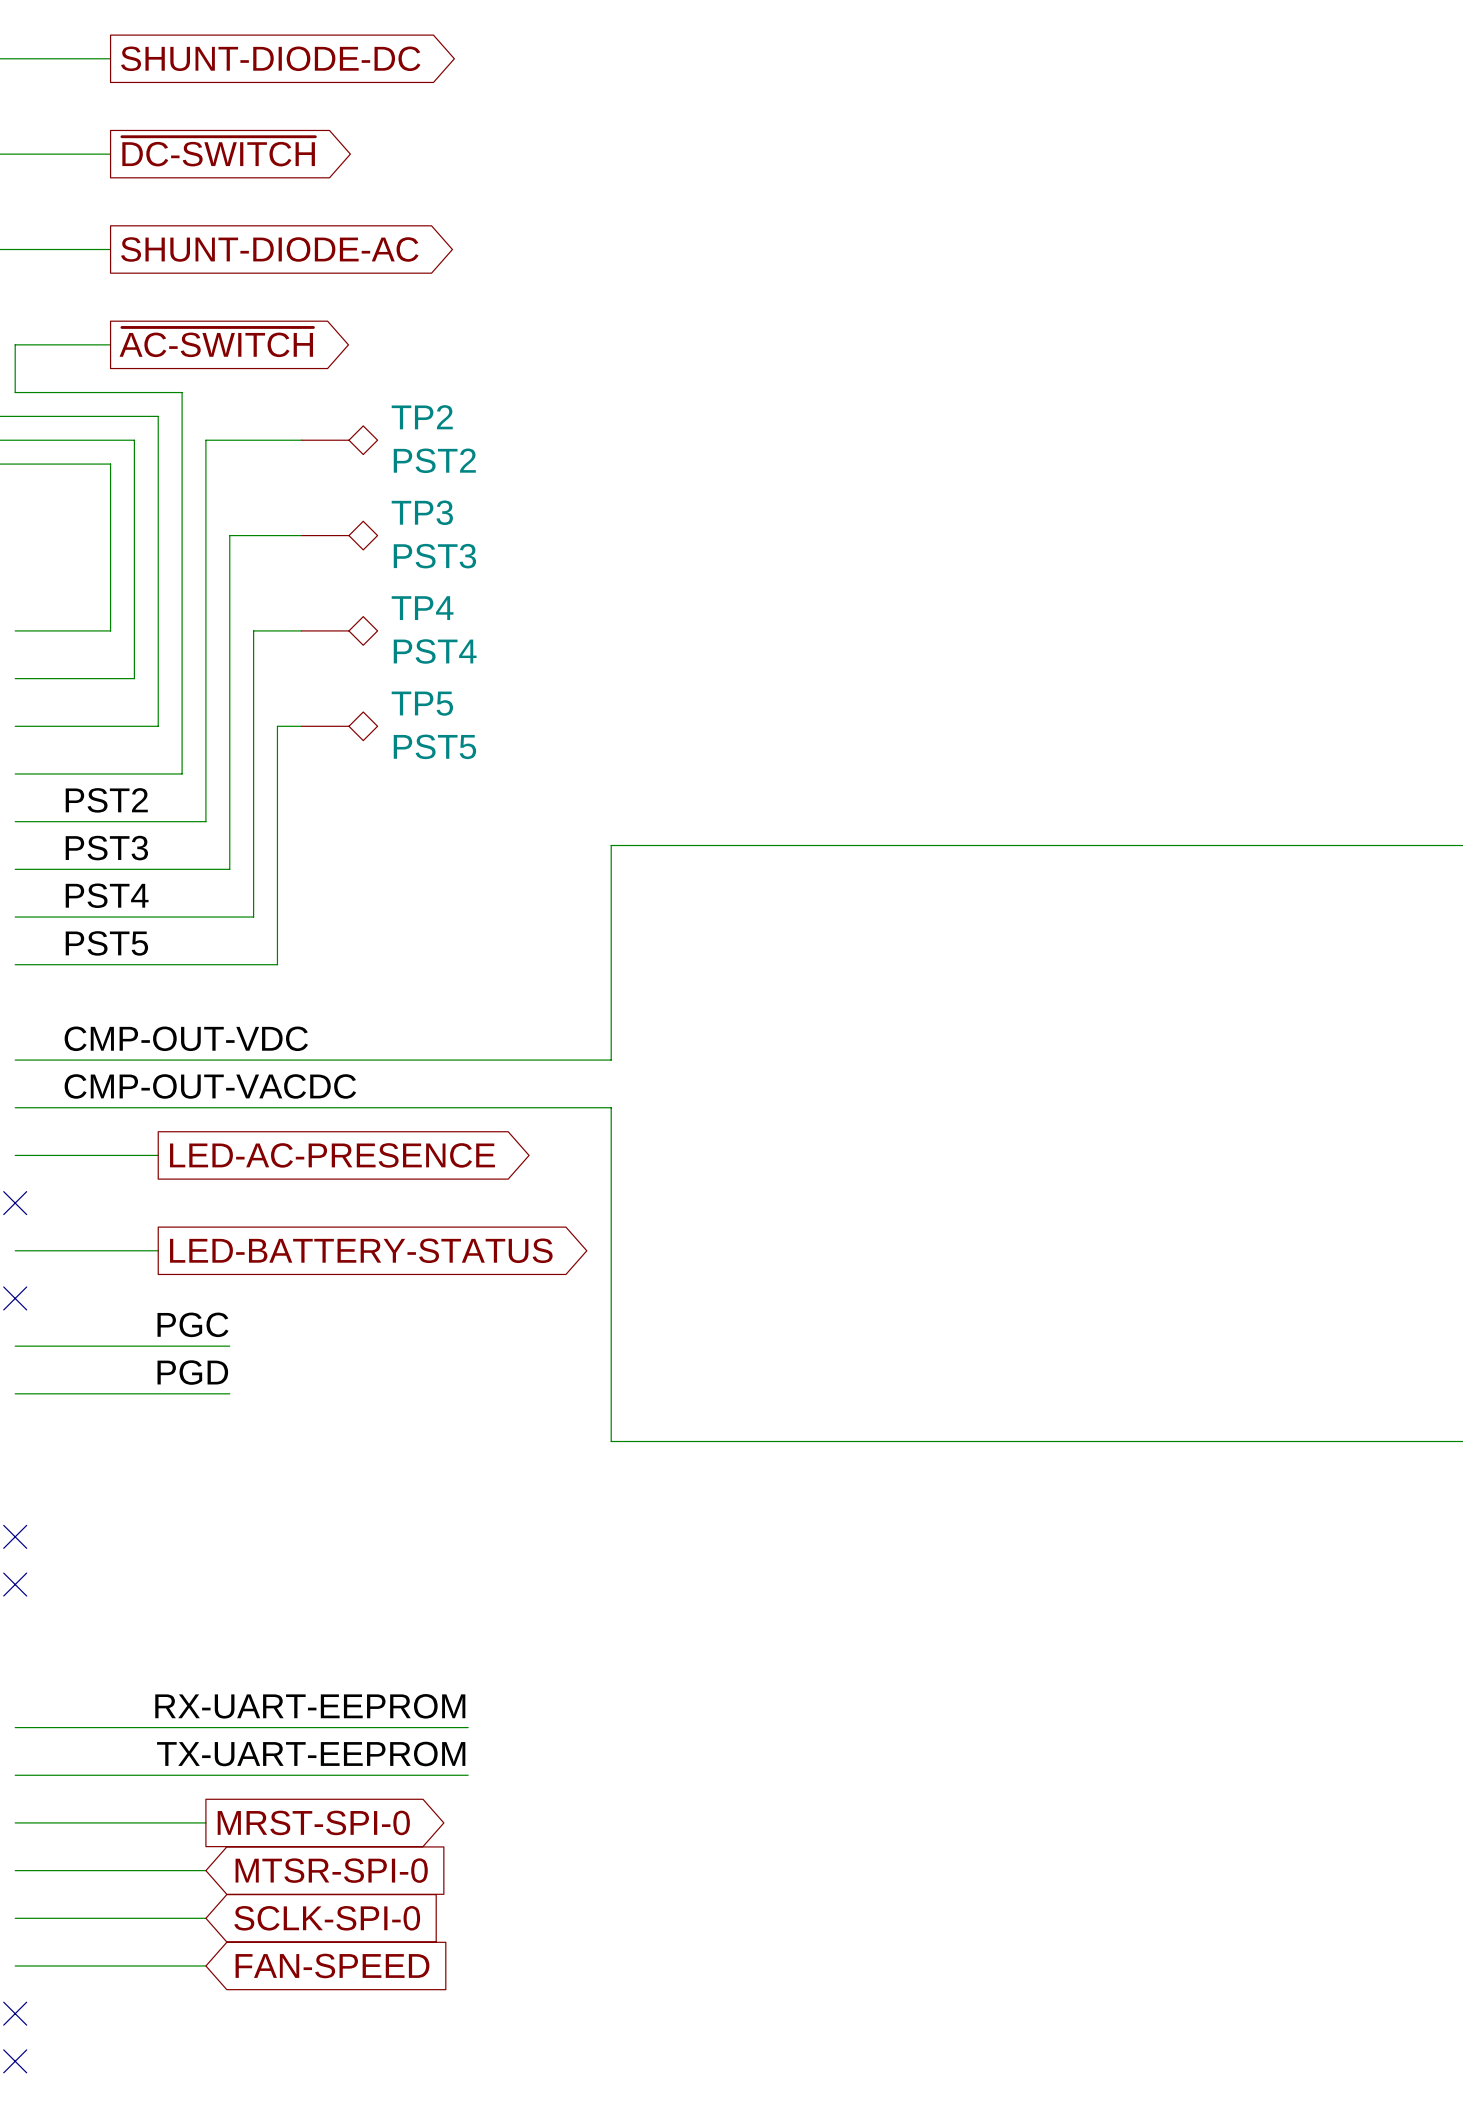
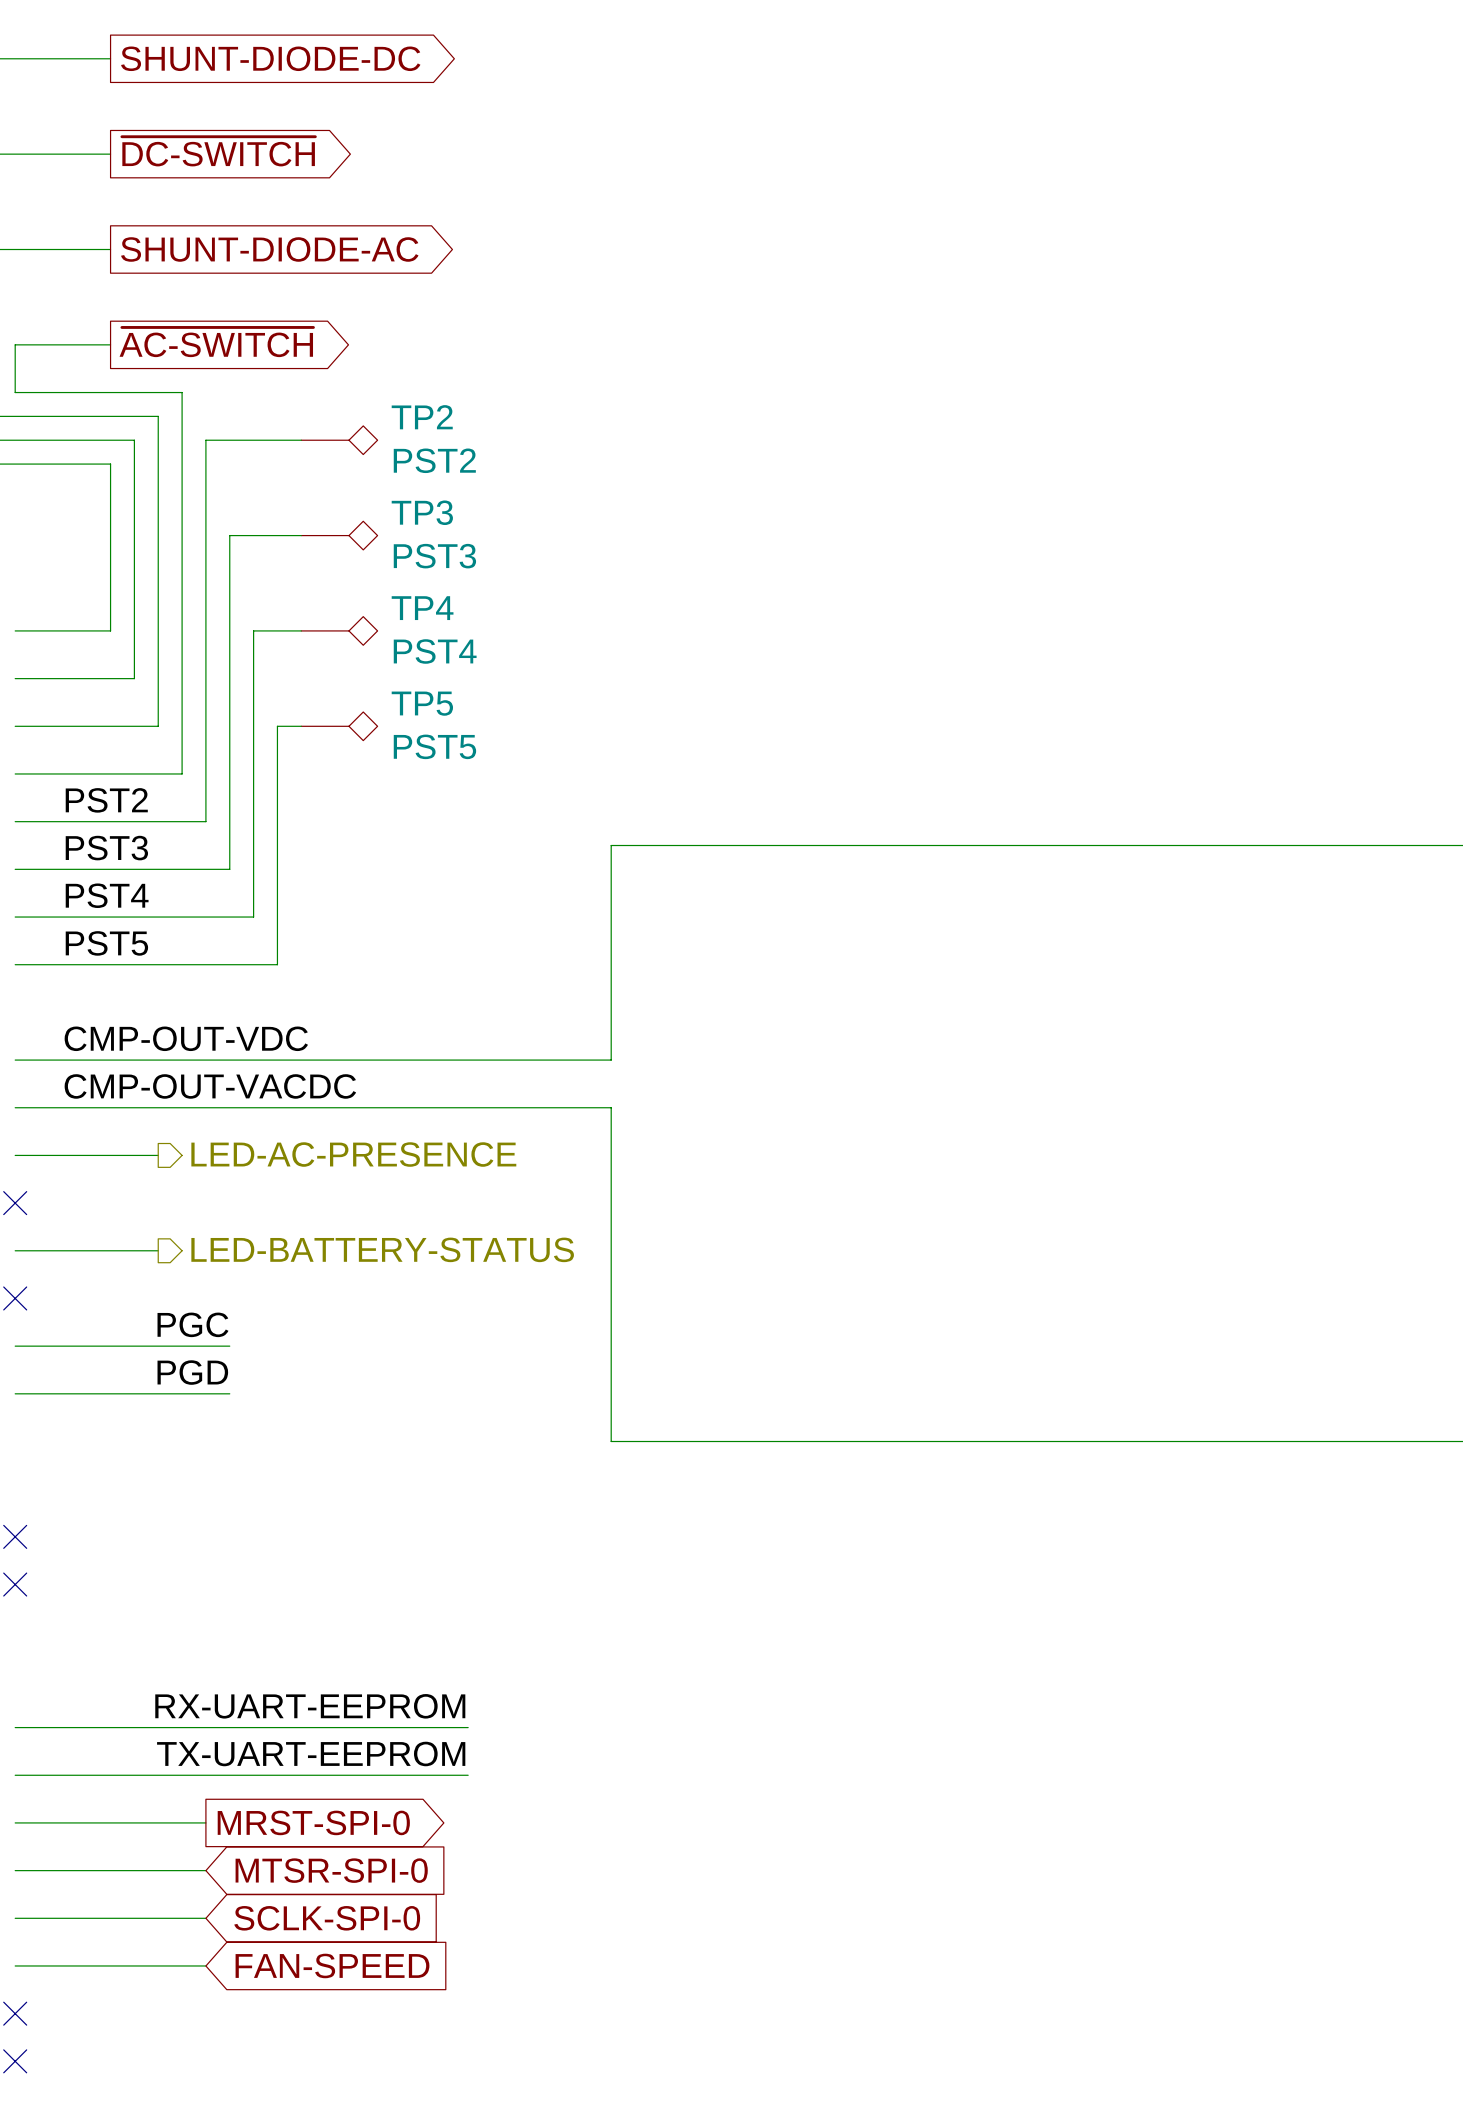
hierarchical label: none -> LED-AC-PRESENCE (353, 1154)
global label: LED-AC-PRESENCE (332, 1155) -> none
hierarchical label: none -> LED-BATTERY-STATUS (382, 1249)
global label: LED-BATTERY-STATUS (361, 1250) -> none

